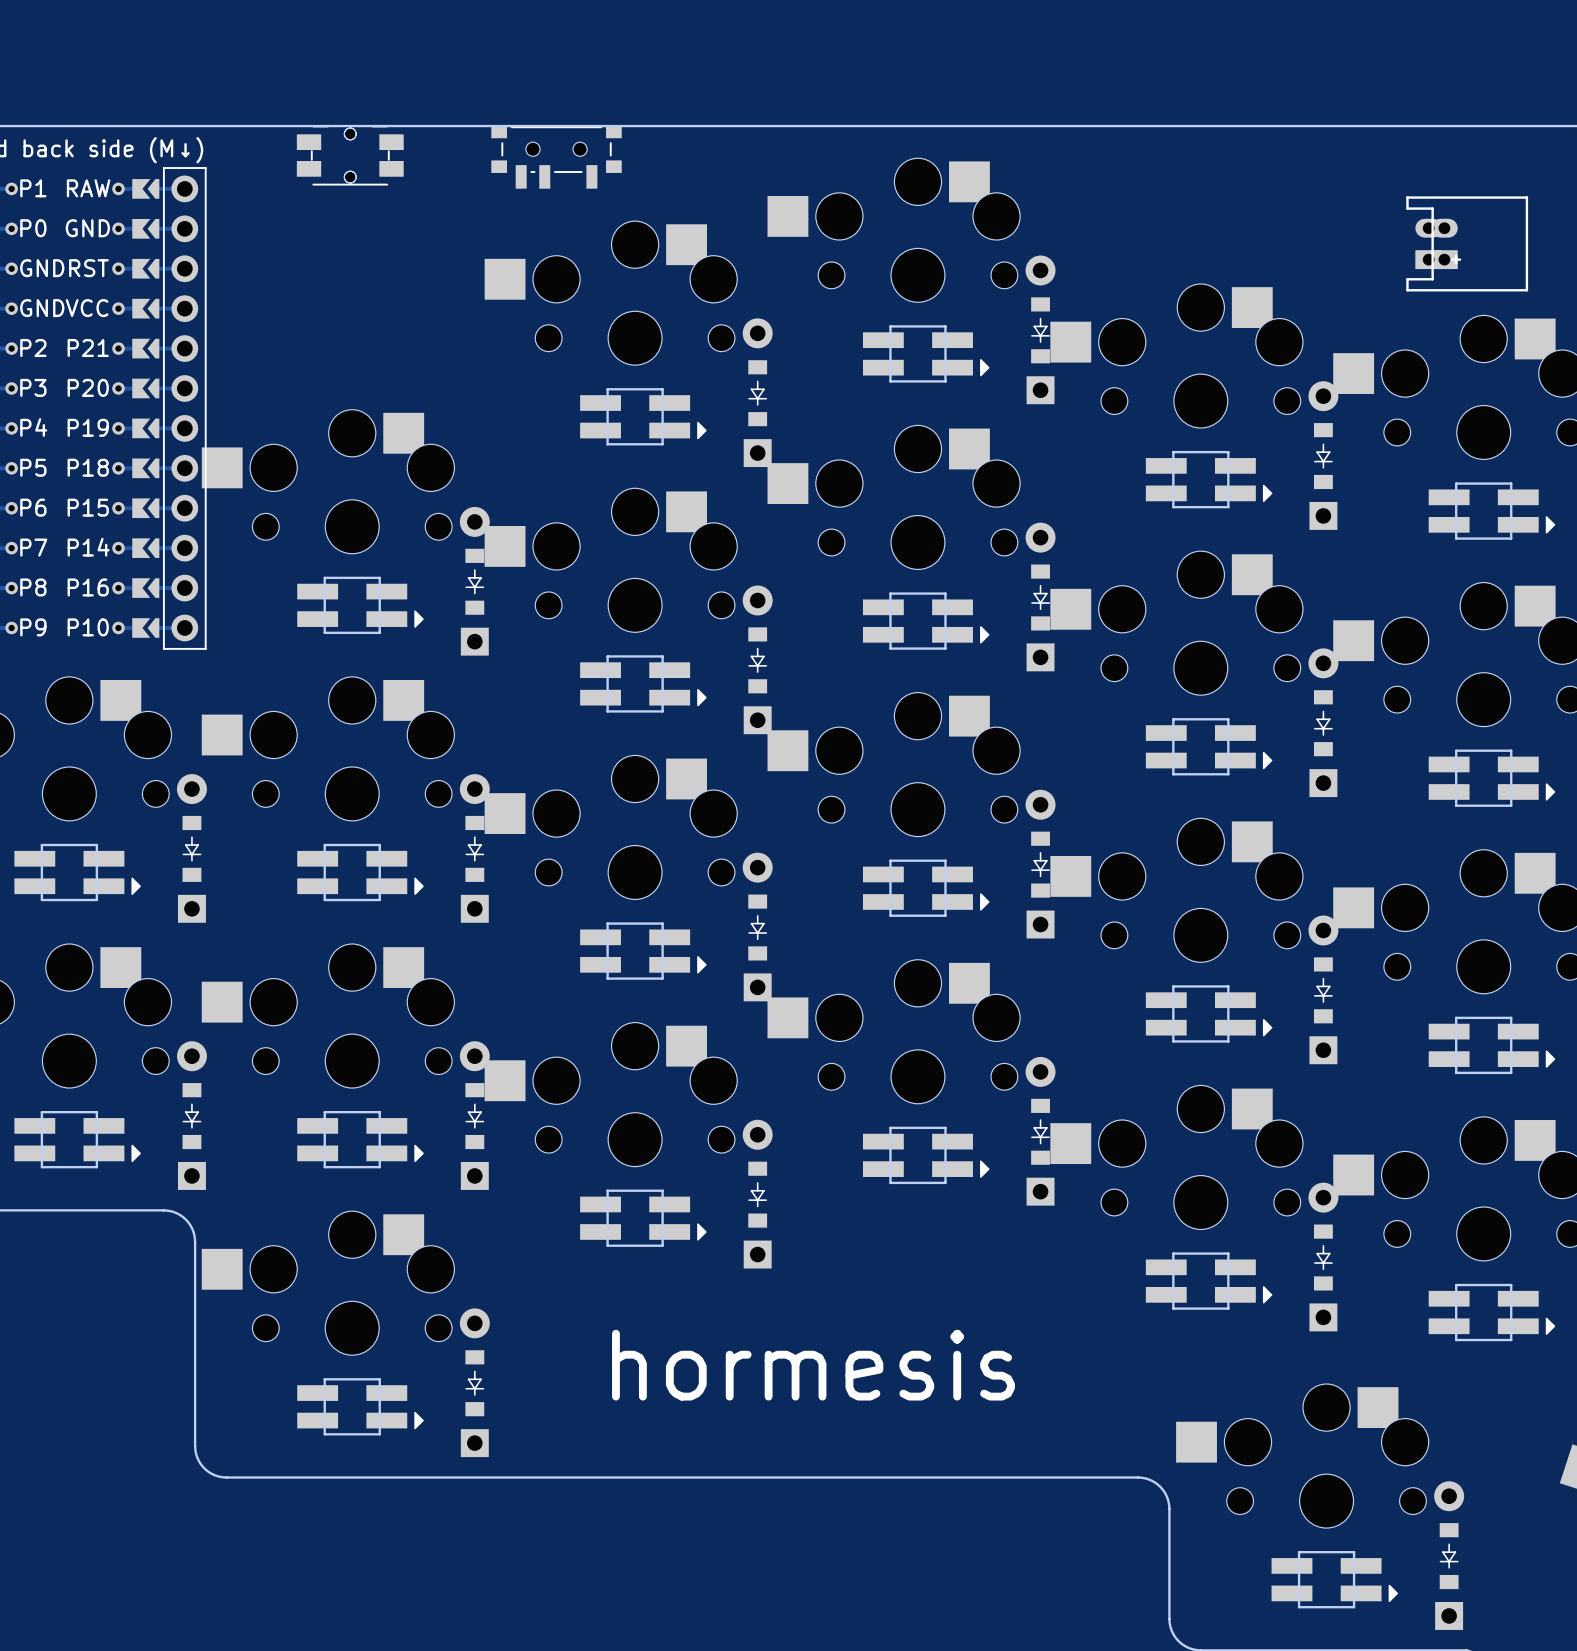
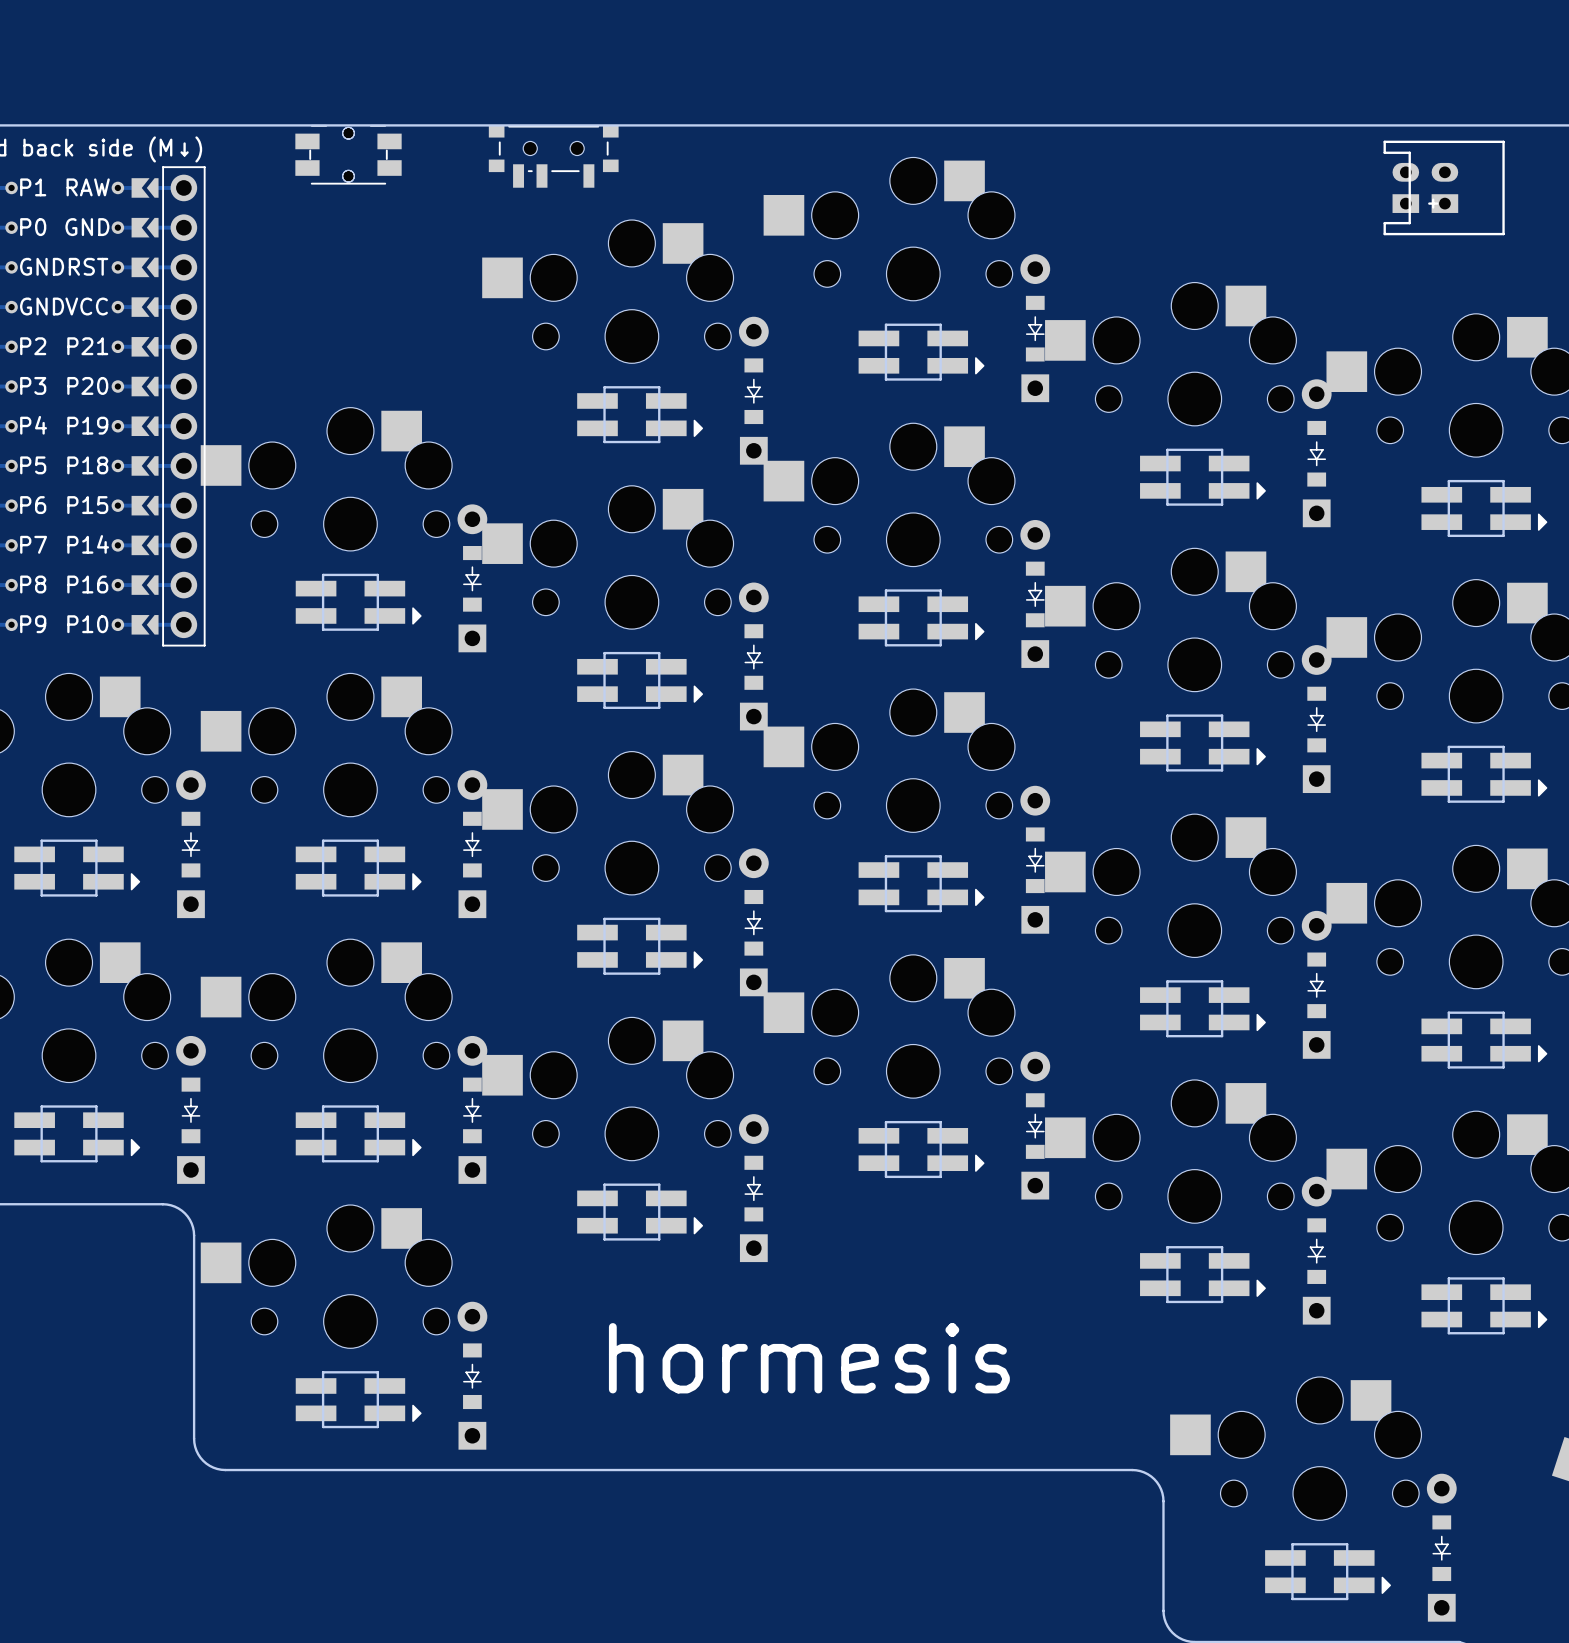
part position: (1444, 243) -> (1444, 187)
part position: (1467, 243) -> (1444, 187)

